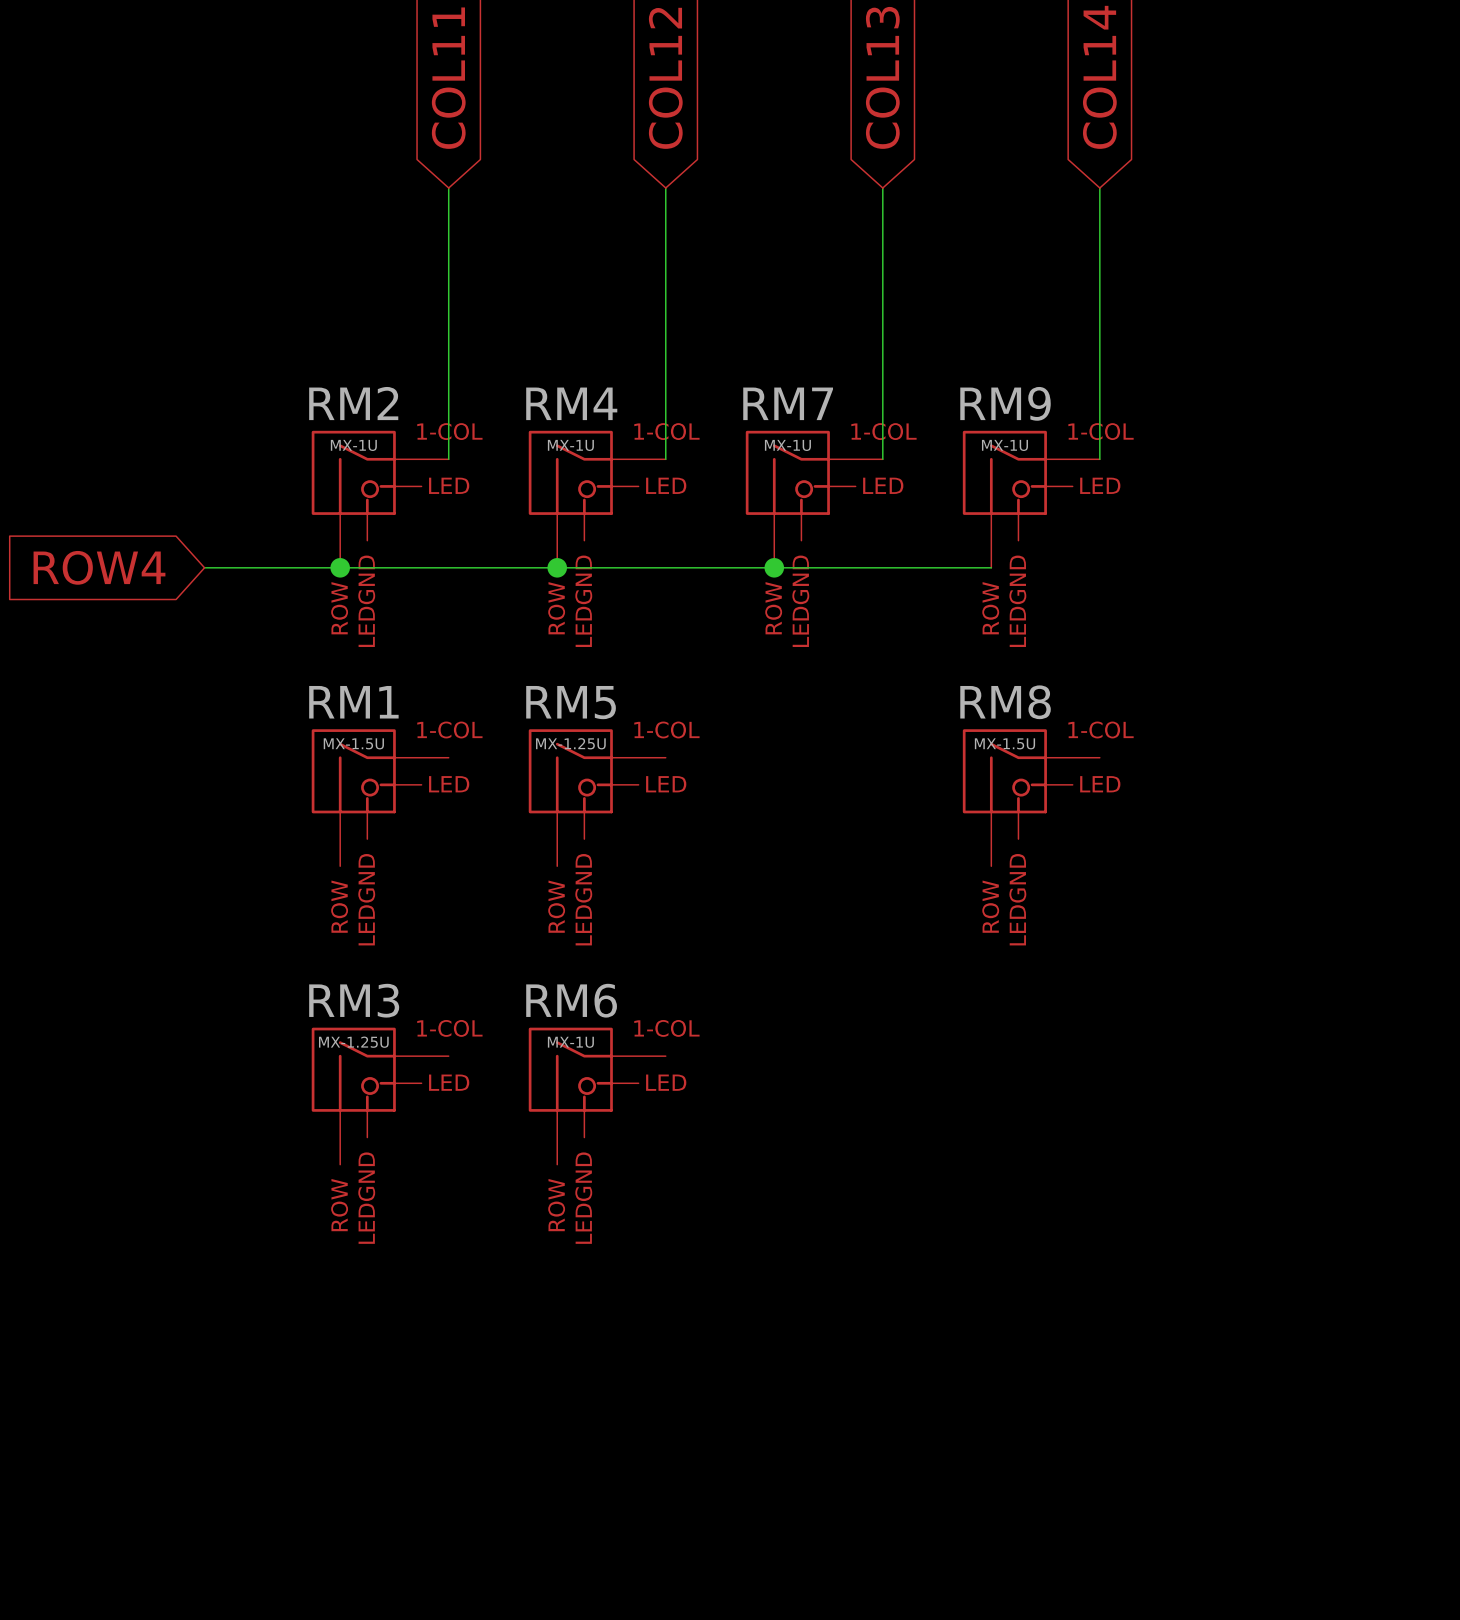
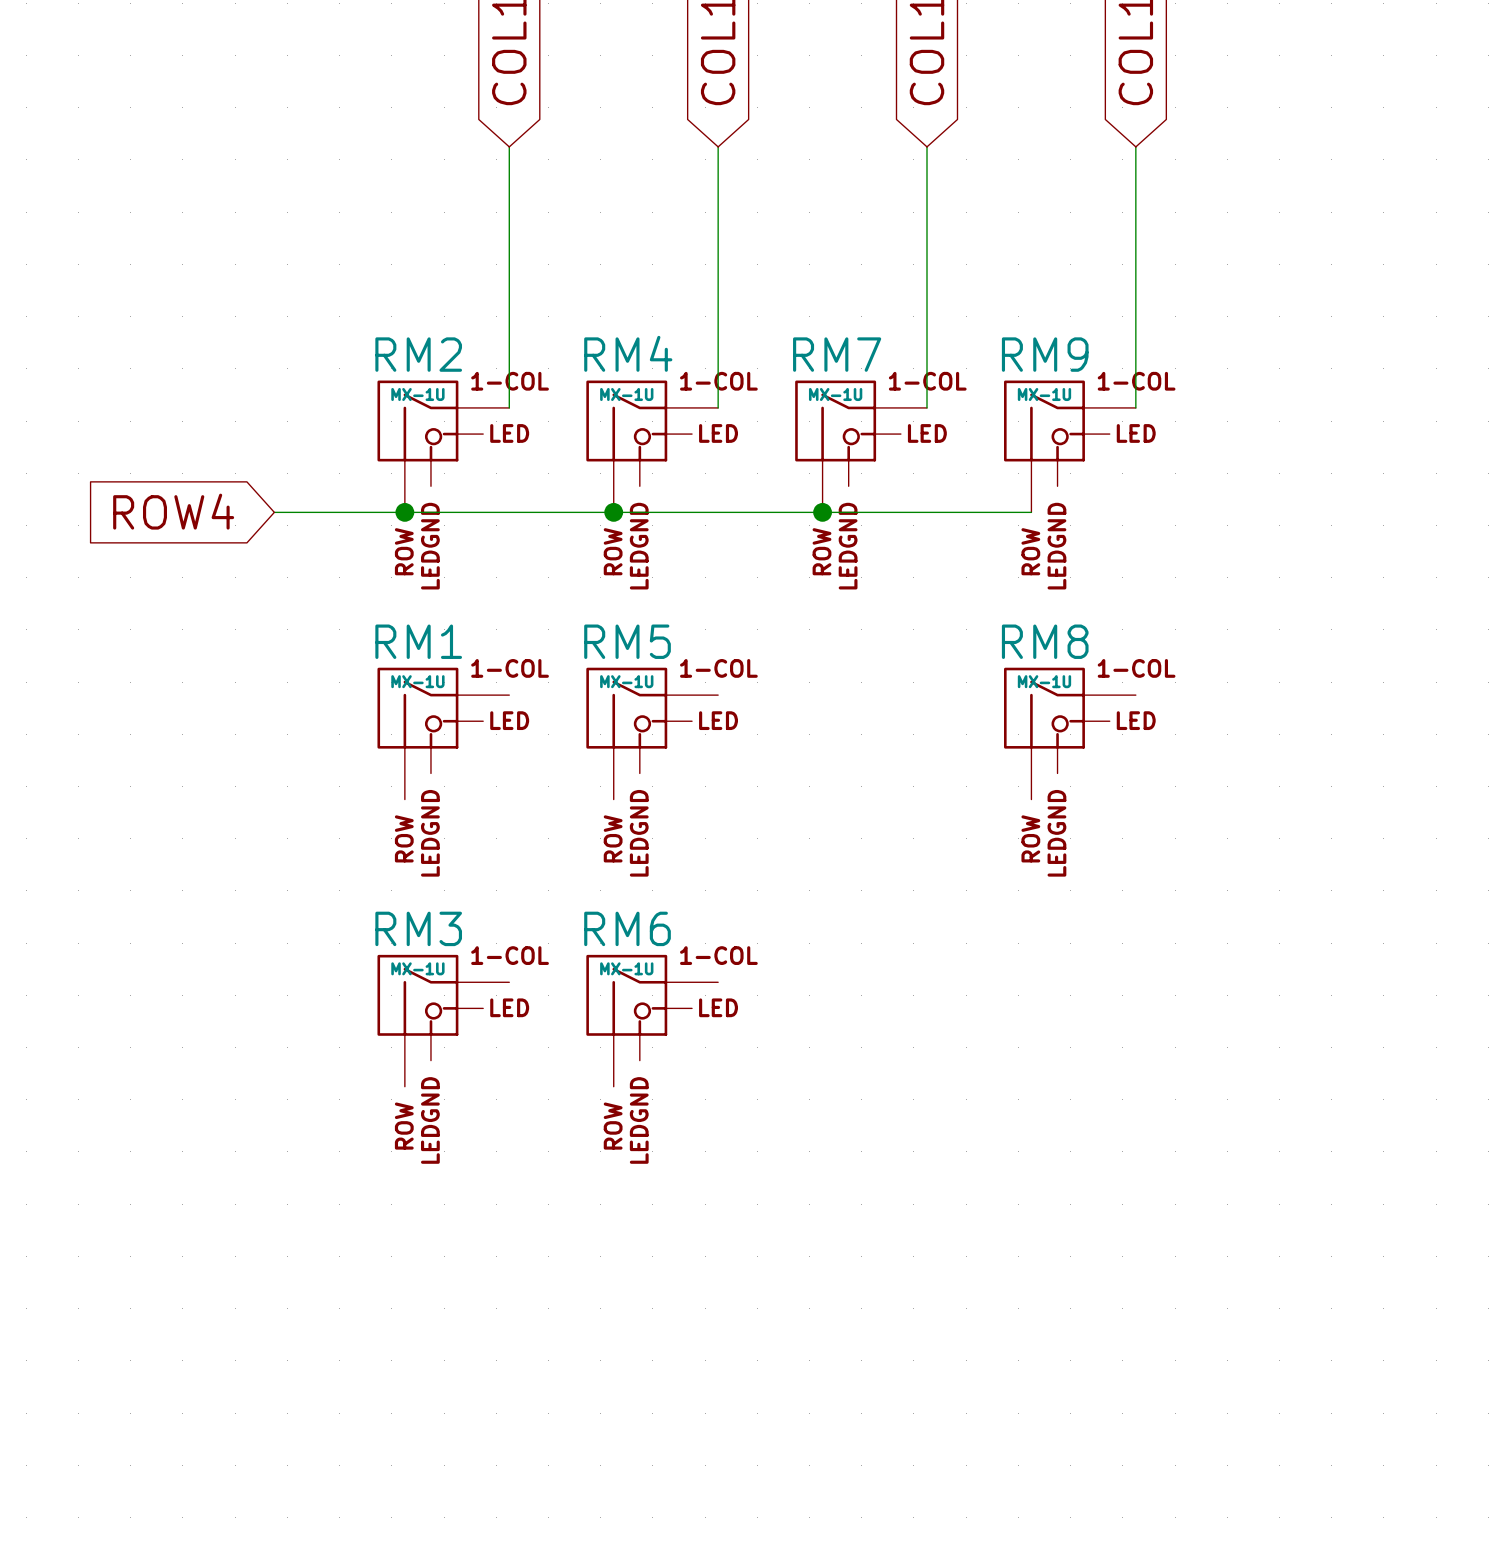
RM1 value: MX-1.5U (353, 743) -> MX-1U (417, 681)
RM5 value: MX-1.25U (570, 743) -> MX-1U (626, 681)
RM8 value: MX-1.5U (1004, 743) -> MX-1U (1044, 681)
RM3 value: MX-1.25U (353, 1042) -> MX-1U (417, 968)

